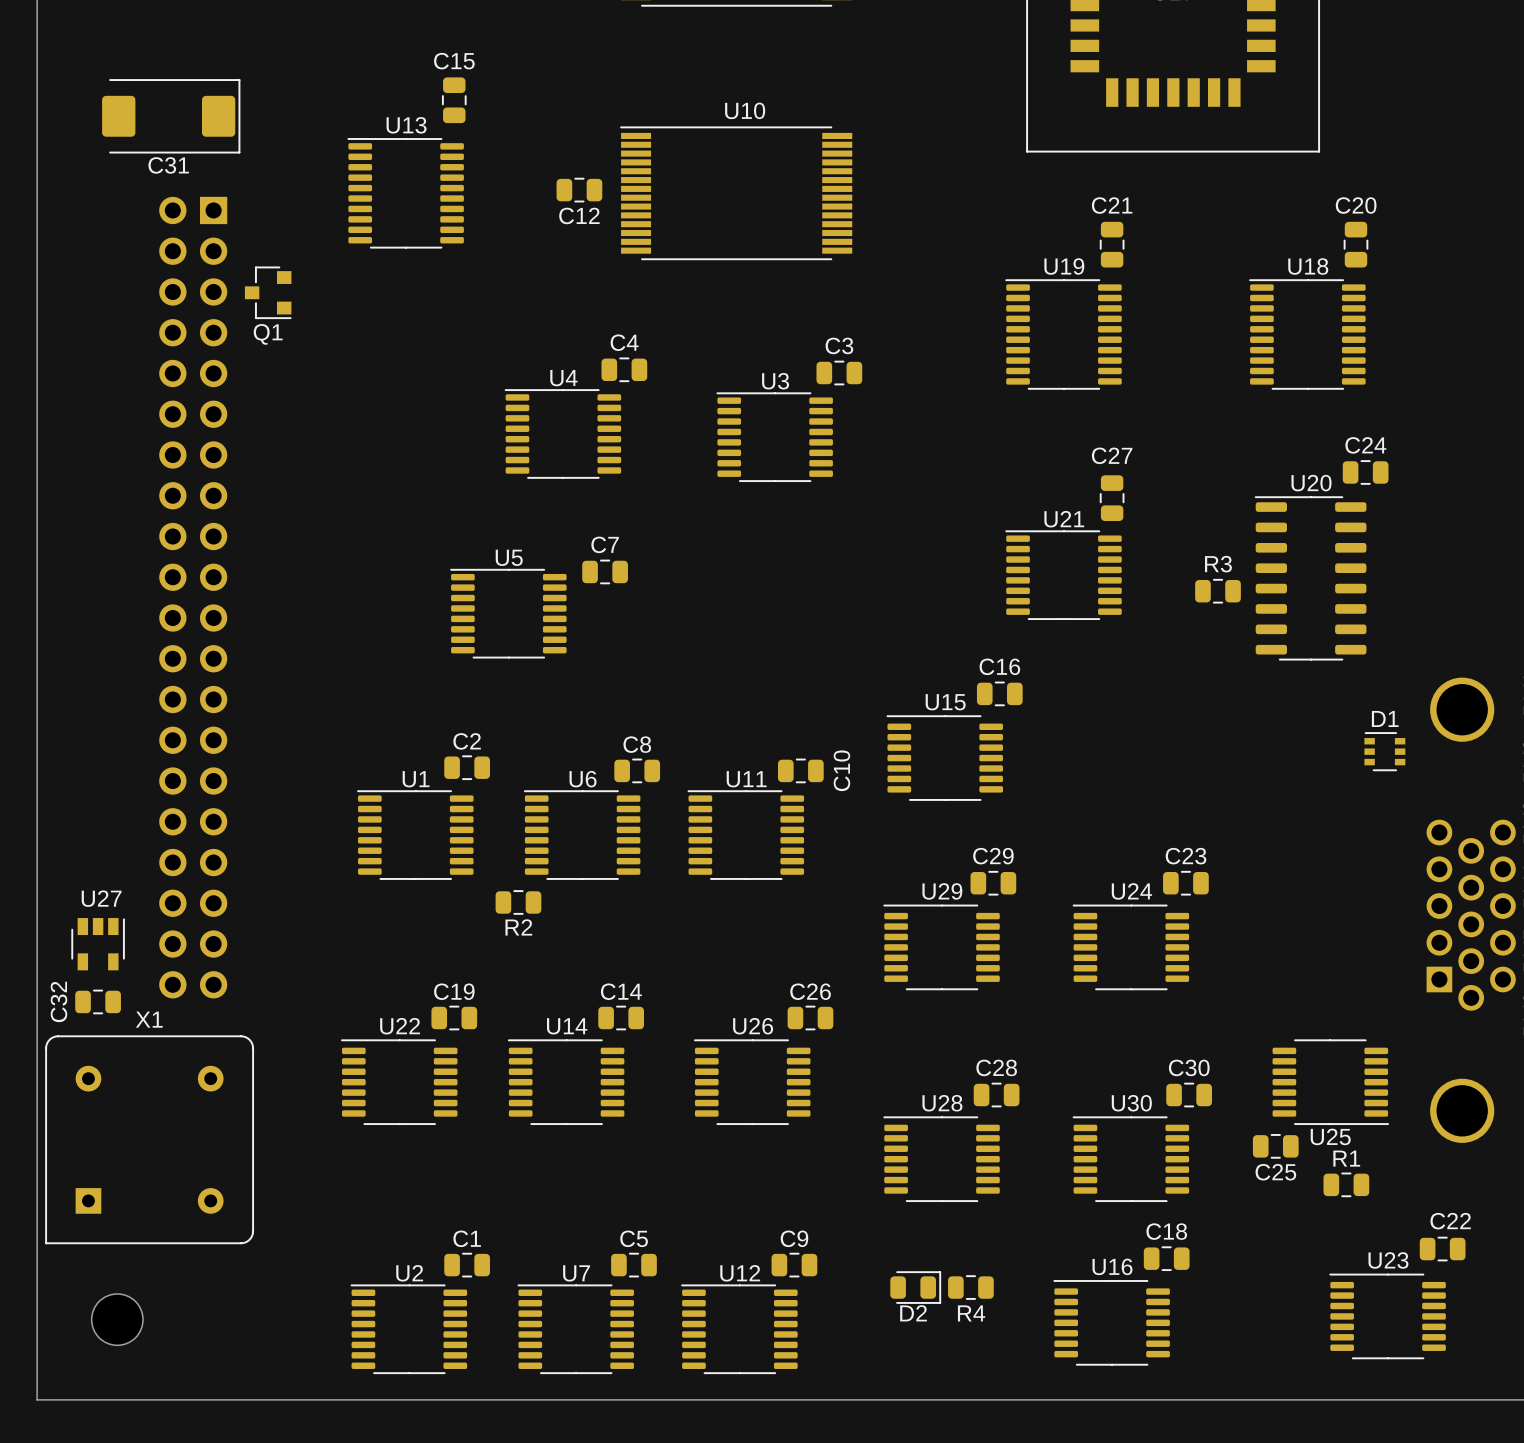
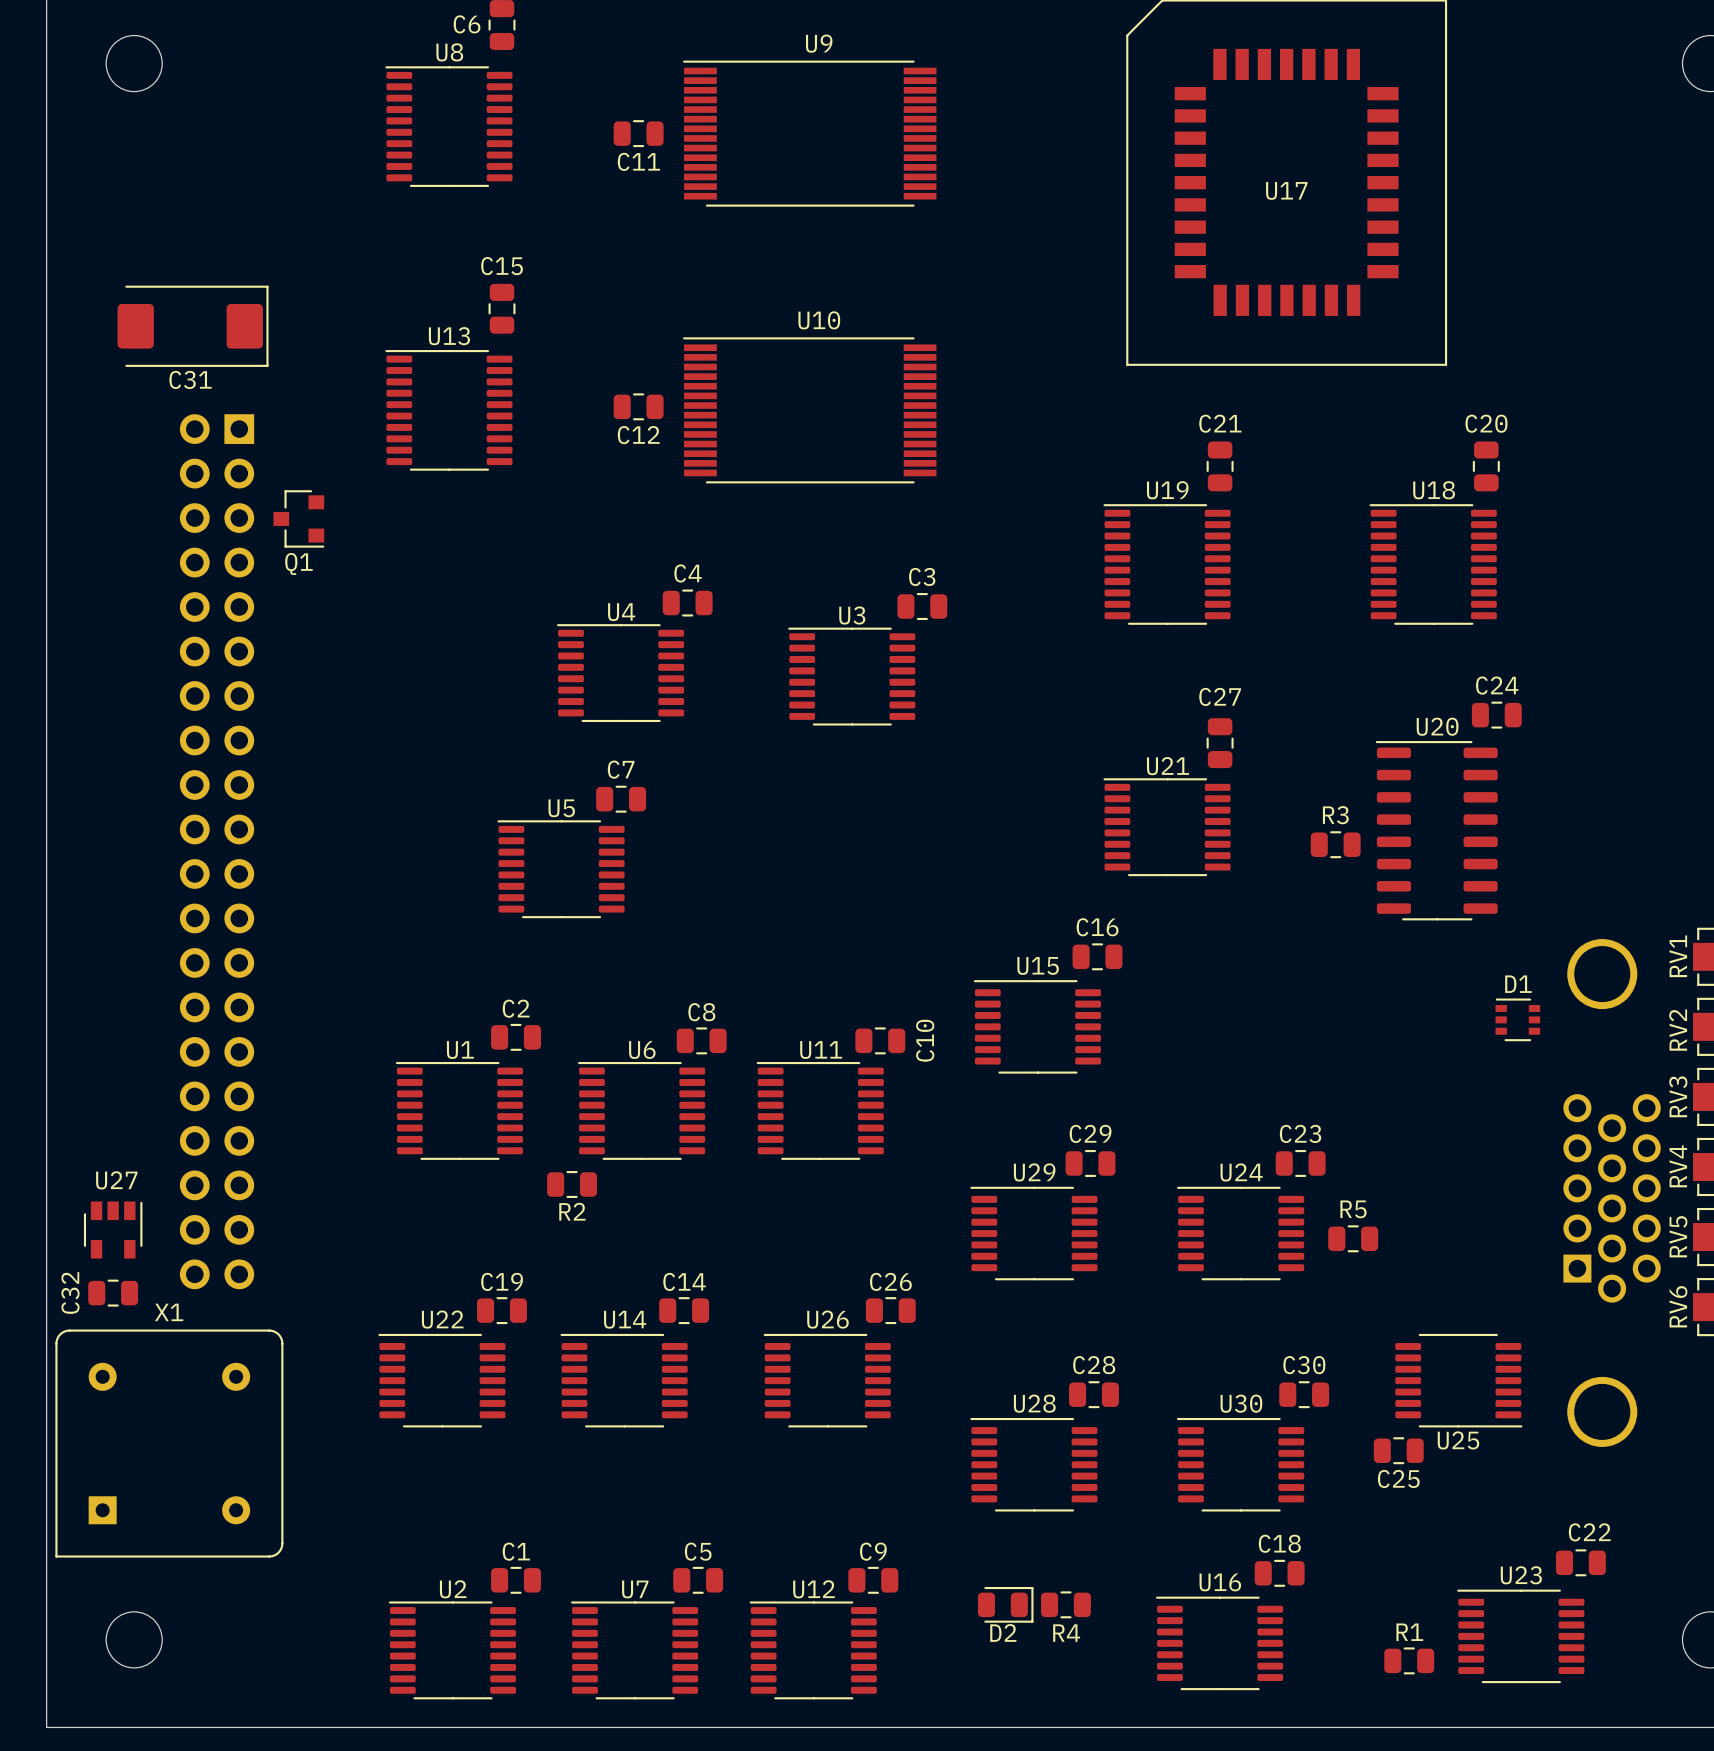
C7 position: (605, 571) -> (621, 799)
R5: none -> (1353, 1238)
R1 position: (1346, 1184) -> (1409, 1660)

